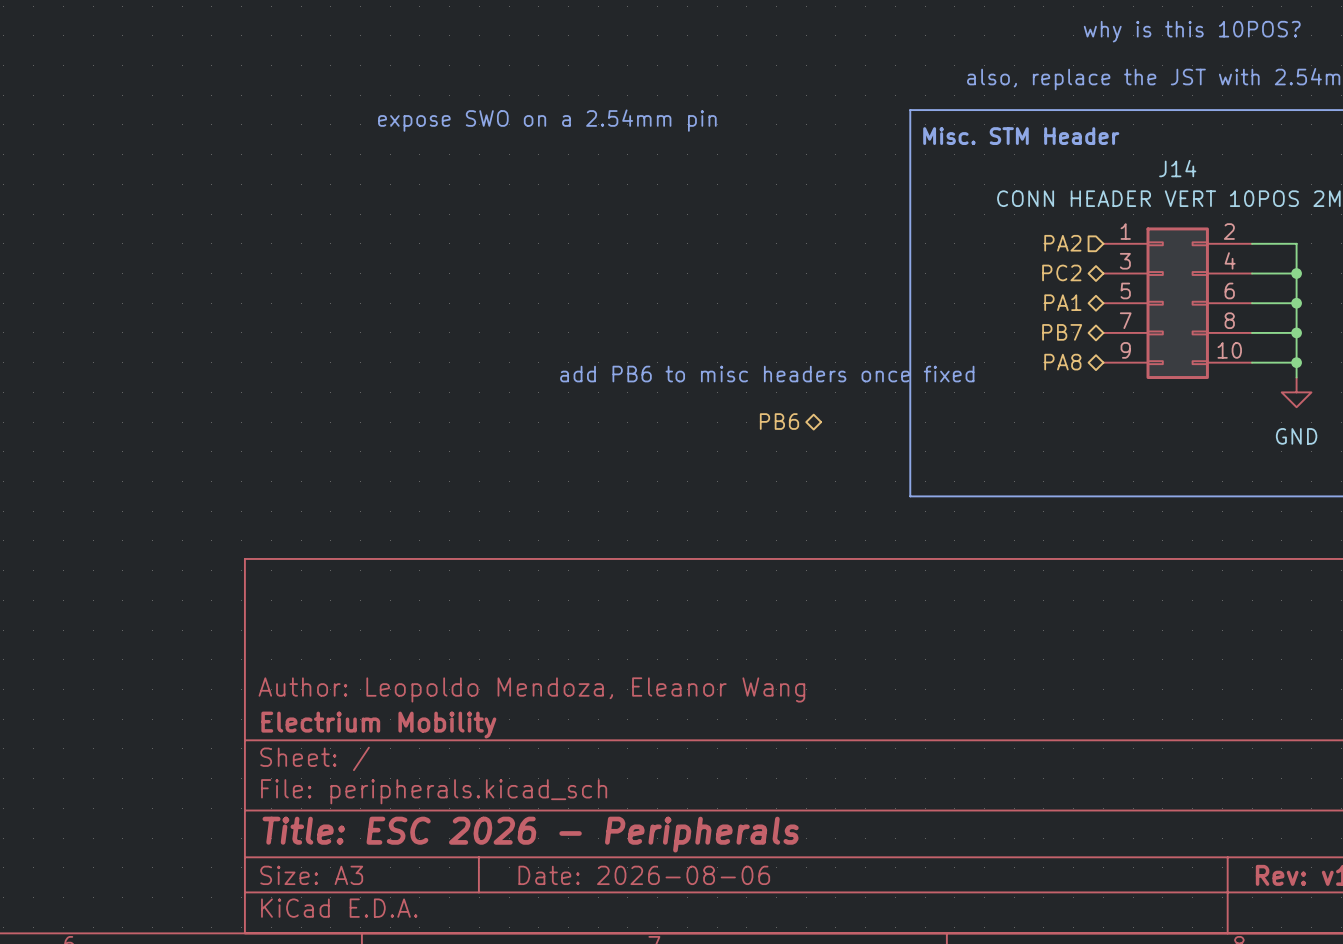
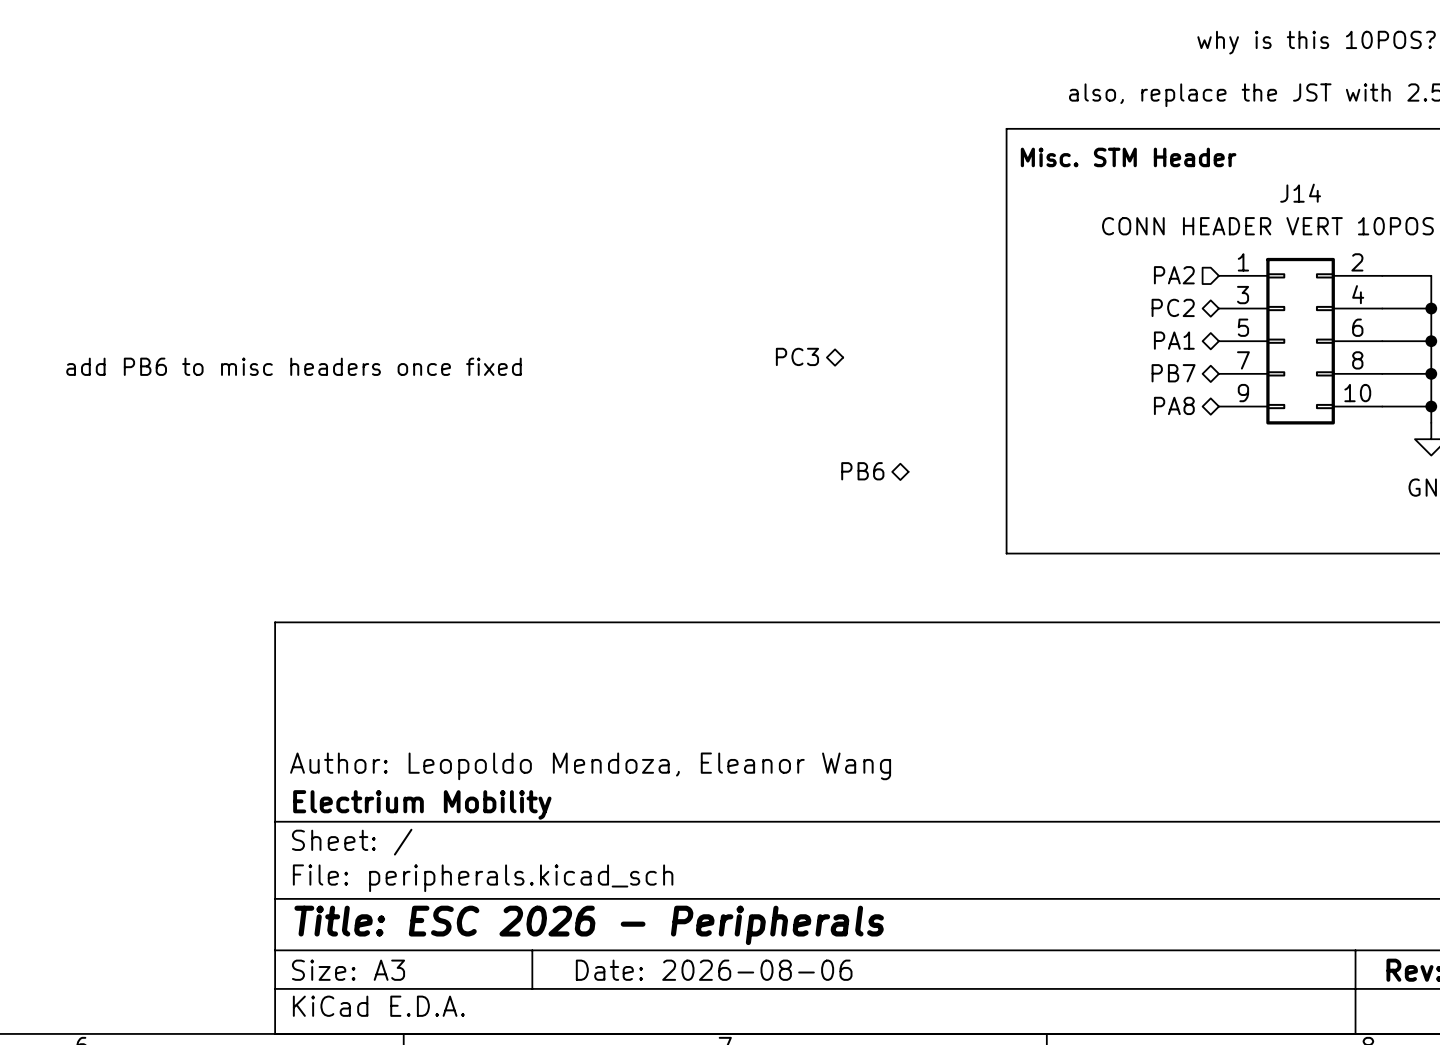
text: expose SWO on a 2.54mm pin (547, 120) -> none
hierarchical label: none -> PC3 (797, 356)
text: none -> add PB6 to misc headers once fixed (293, 366)
text: add PB6 to misc headers once fixed (767, 374) -> none

